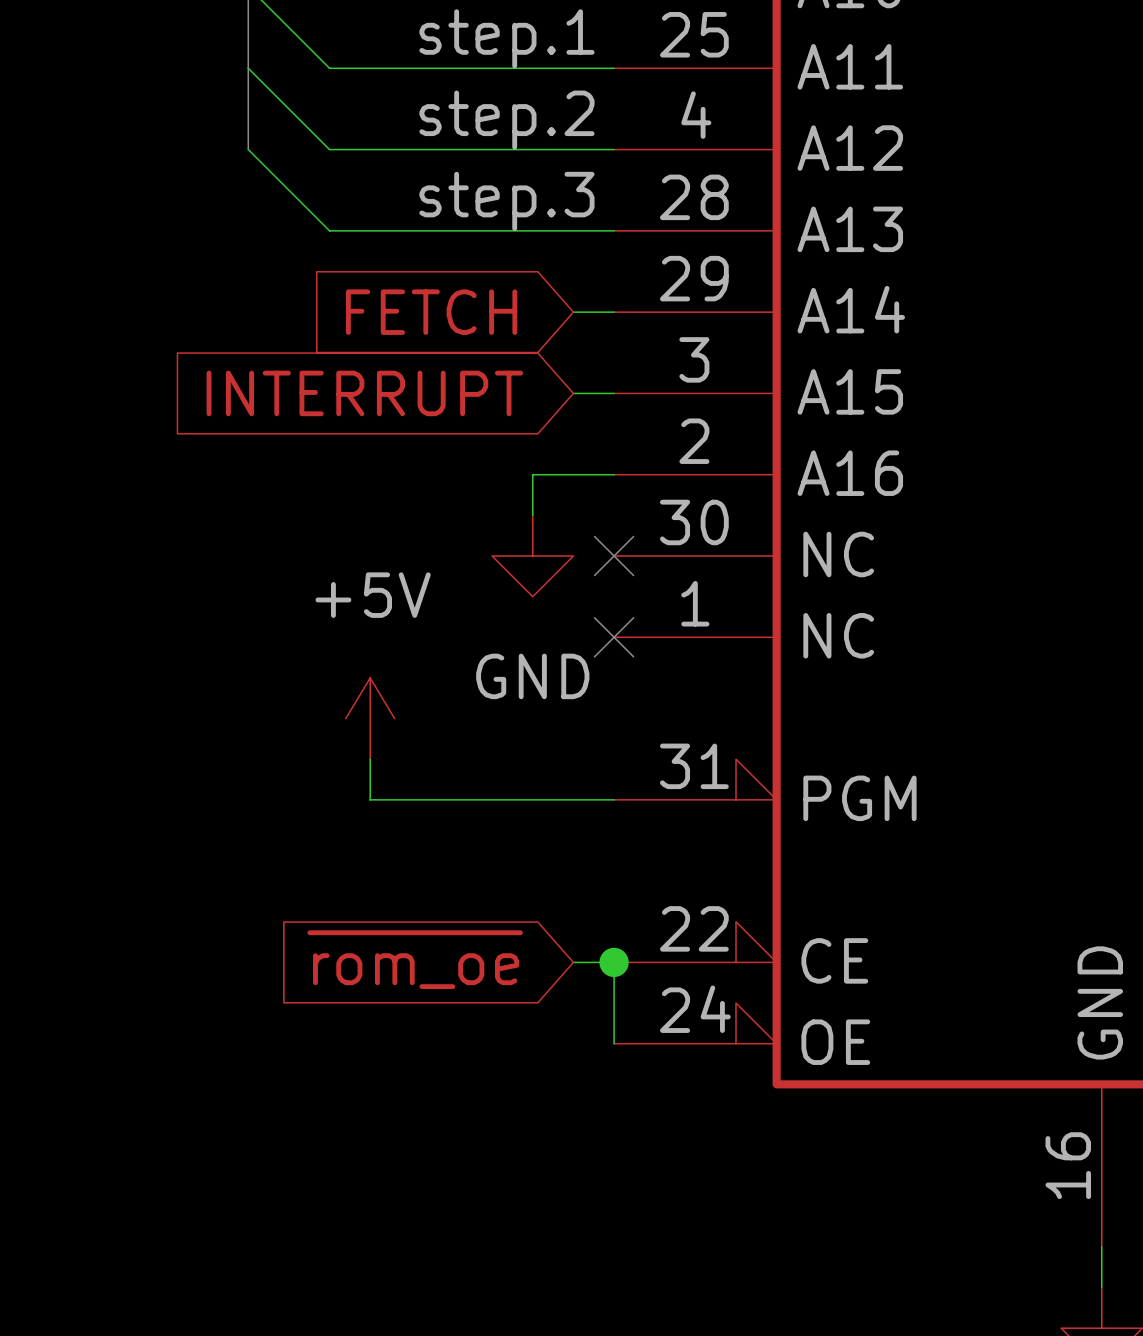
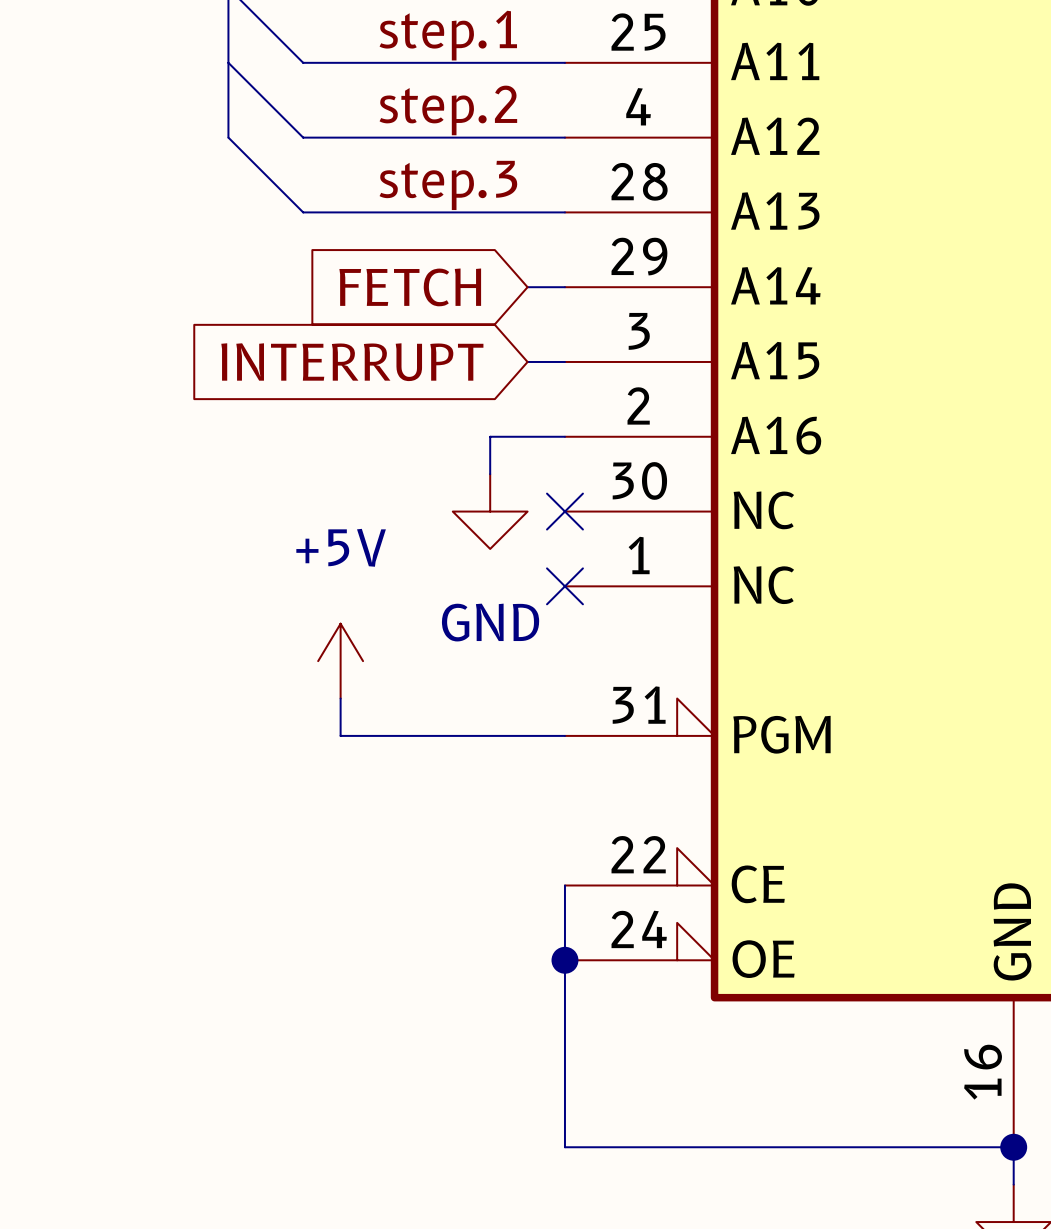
global label: ~{rom_oe} (415, 959) -> none
wire: (573, 962) (614, 962) -> none
junction position: (614, 962) -> (564, 960)
wire: none -> (564, 960) (564, 1147) (1013, 1147)
junction: none -> (1013, 1147)

